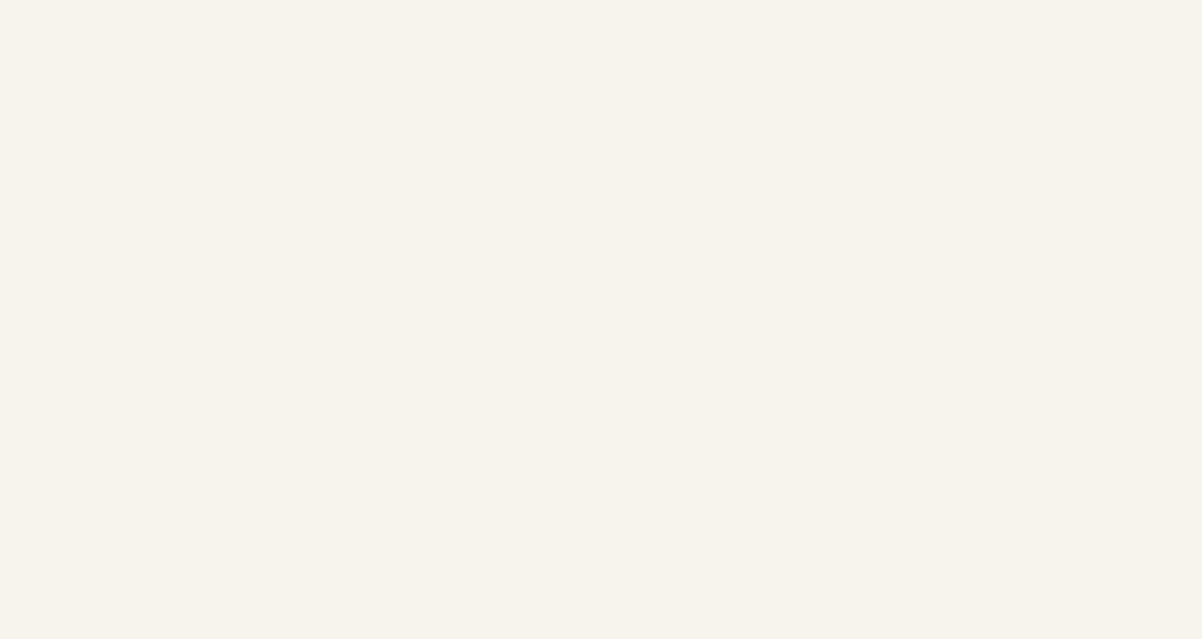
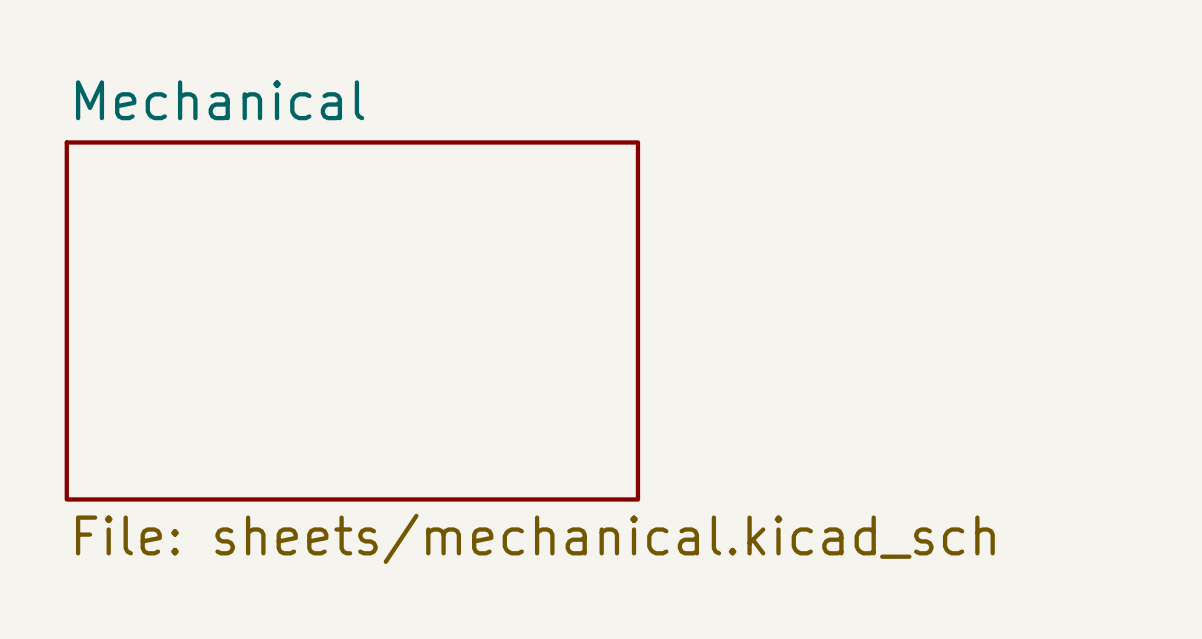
sheet Mechanical: none -> File: sheets/mechanical.kicad_sch (352, 320)

